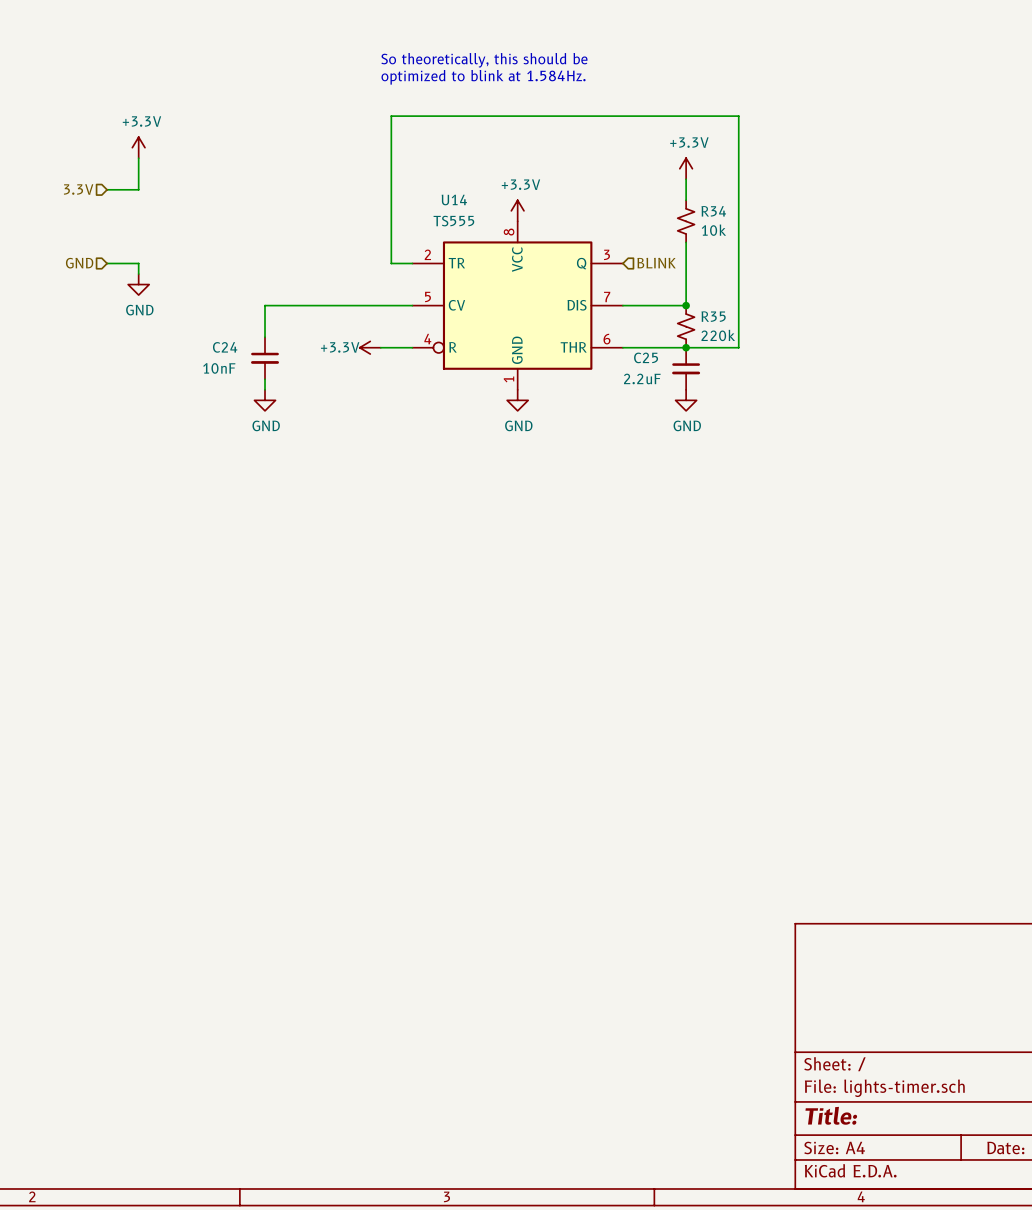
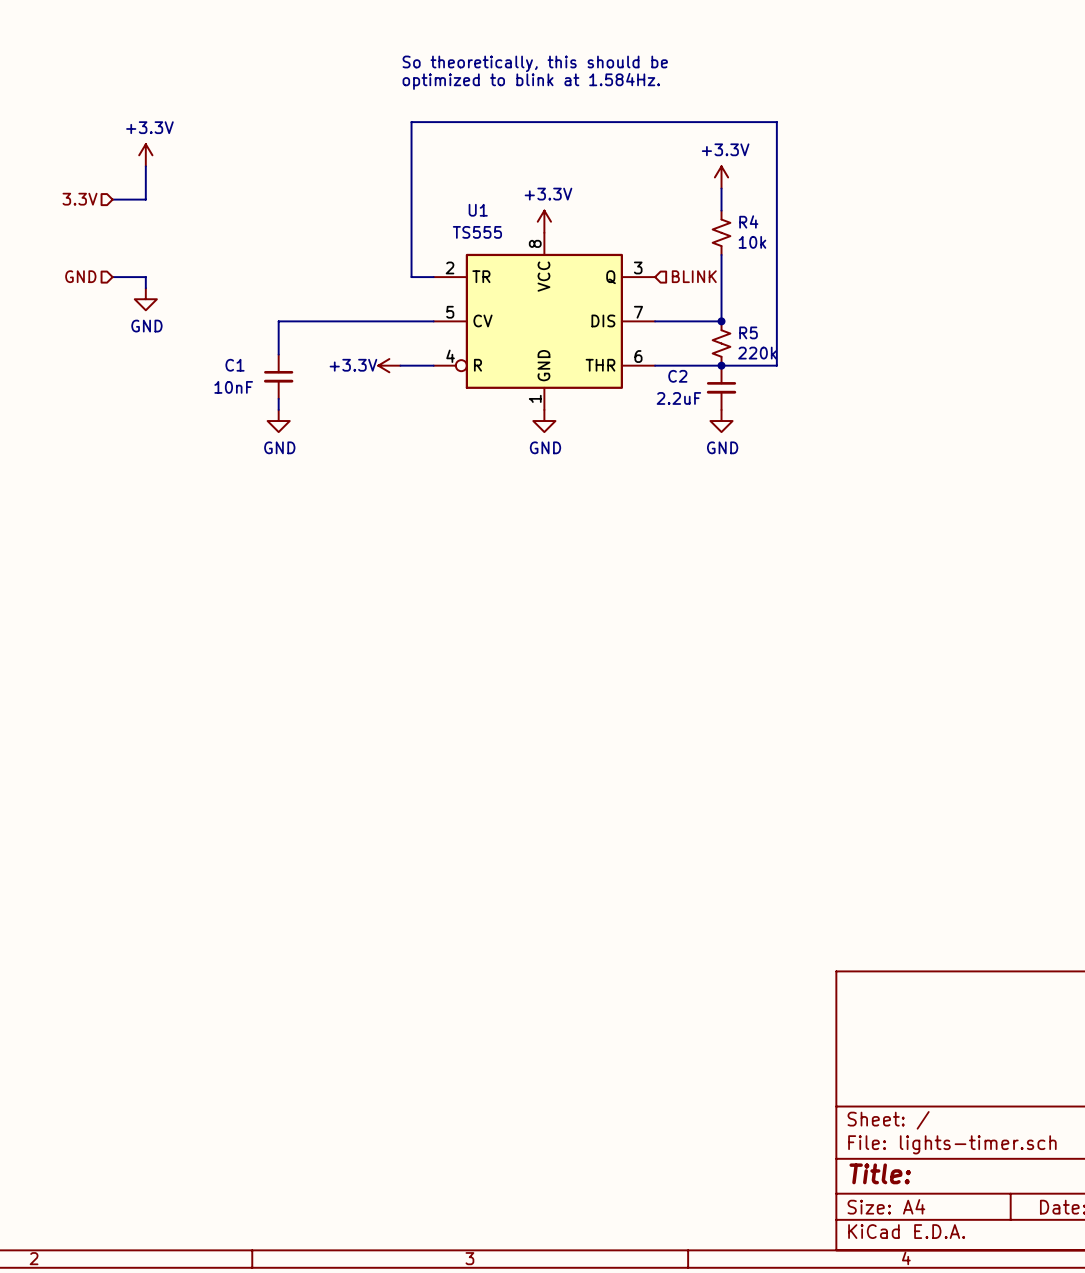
U14 name: U14 (454, 199) -> U1 (478, 210)
R34 name: R34 (713, 211) -> R4 (748, 221)
R35 name: R35 (713, 316) -> R5 (748, 332)
C24 name: C24 (225, 347) -> C1 (235, 365)
C25 name: C25 (646, 357) -> C2 (677, 376)

